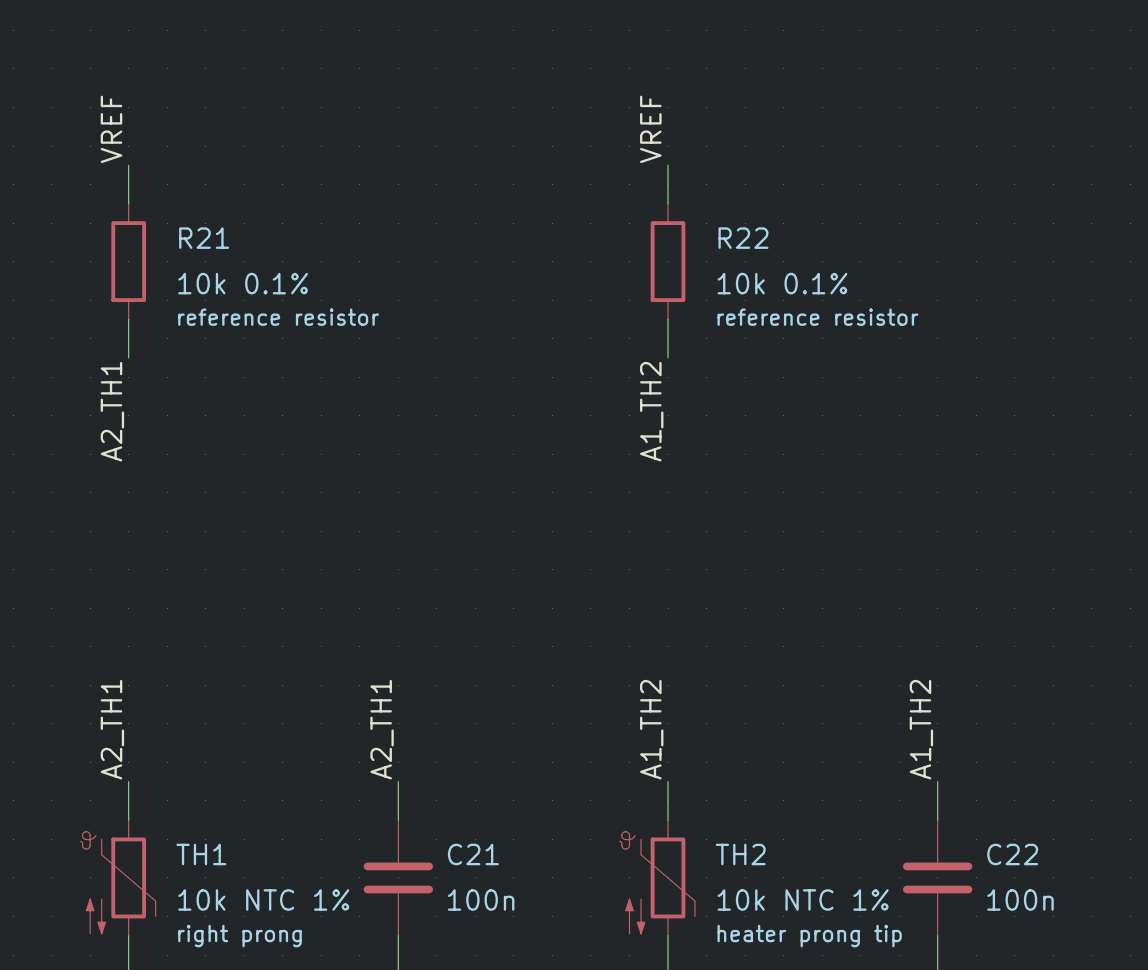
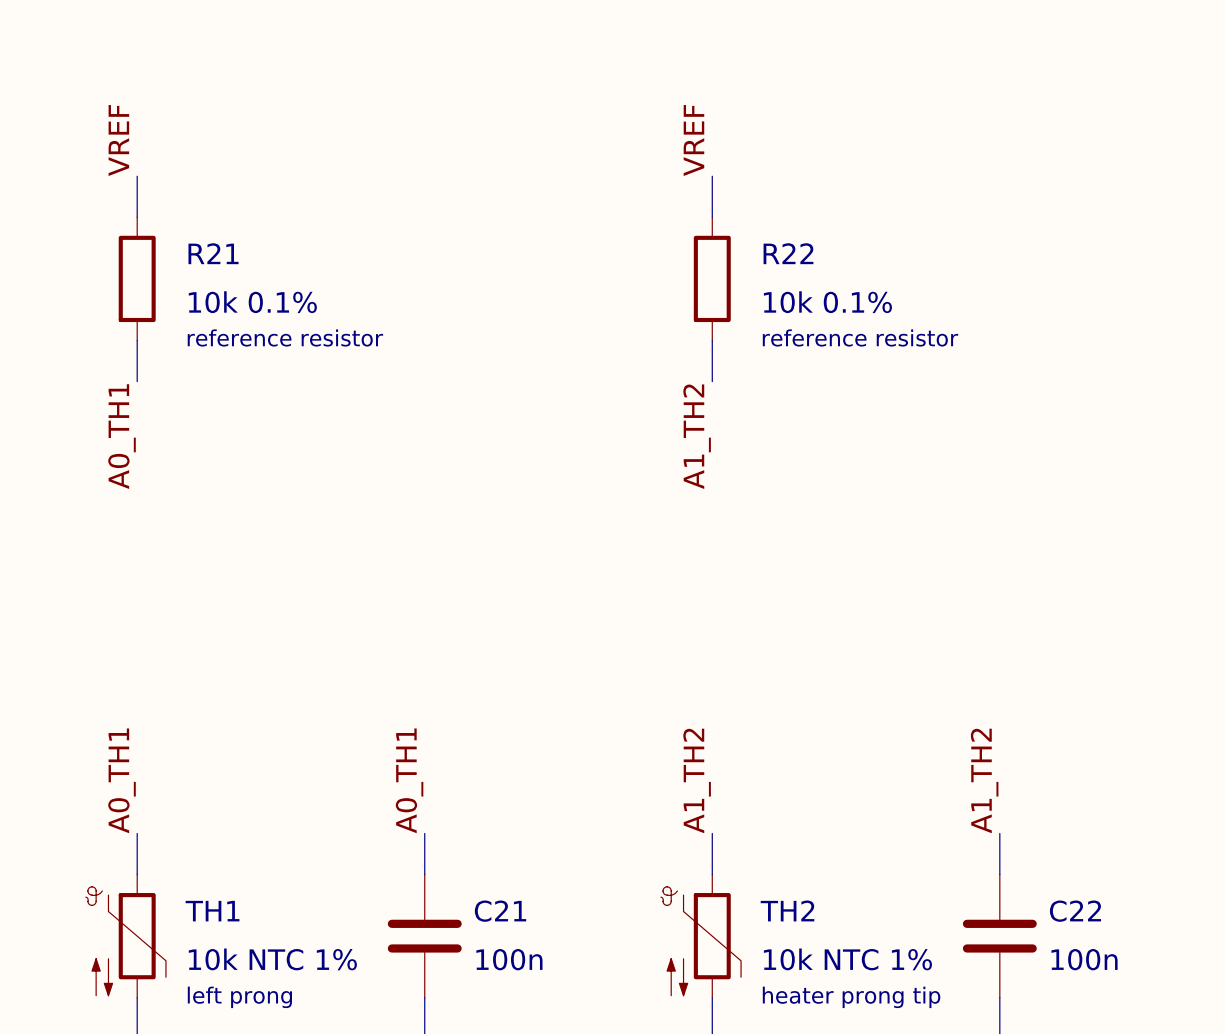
label: A2_TH1 (112, 411) -> A0_TH1 (122, 436)
label: A2_TH1 (112, 729) -> A0_TH1 (122, 780)
label: A2_TH1 (382, 729) -> A0_TH1 (409, 780)
TH1 text: right prong (239, 936) -> left prong (239, 997)

